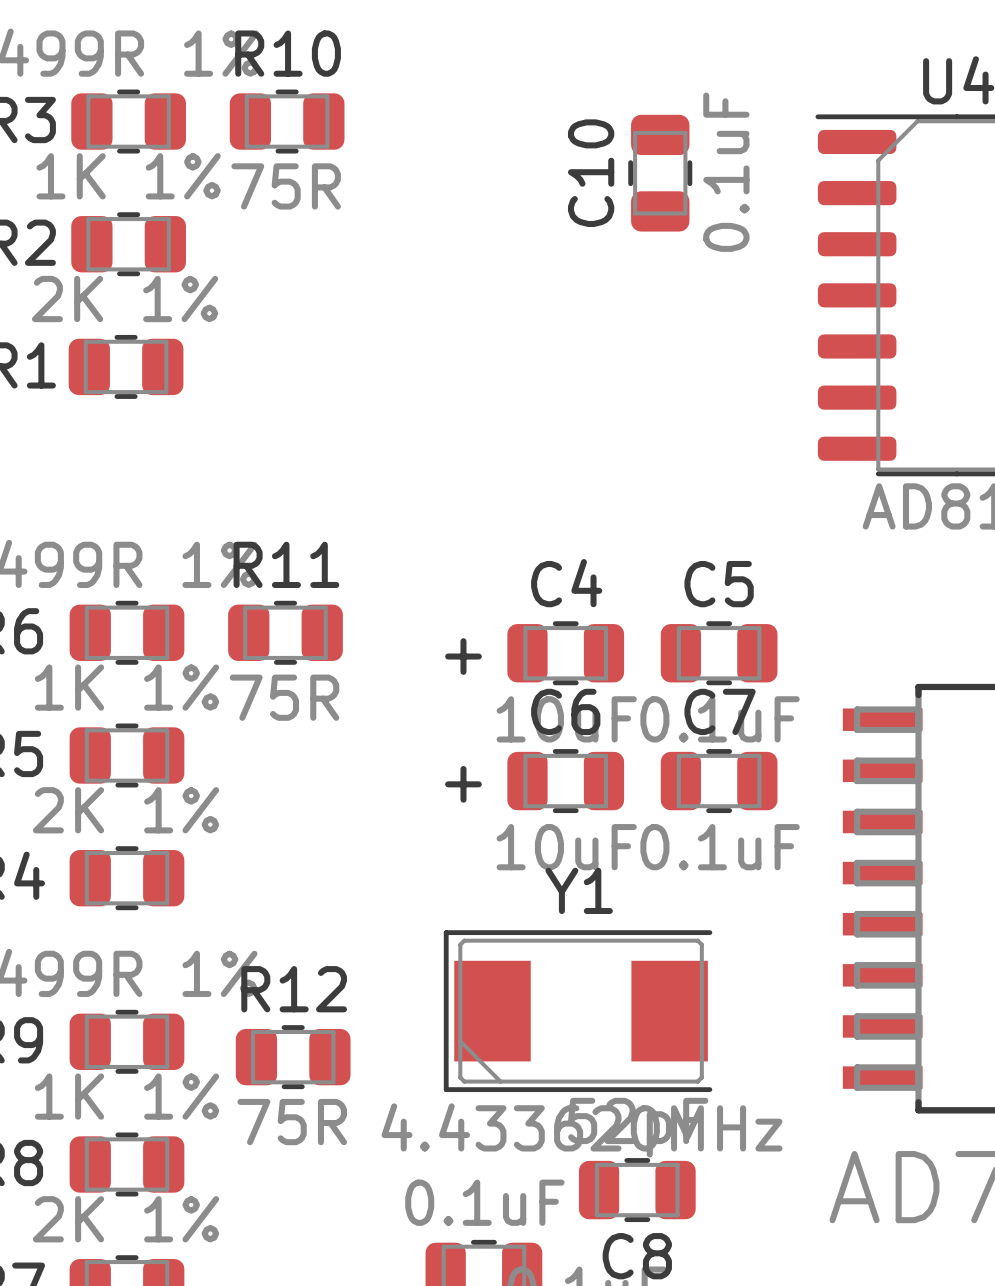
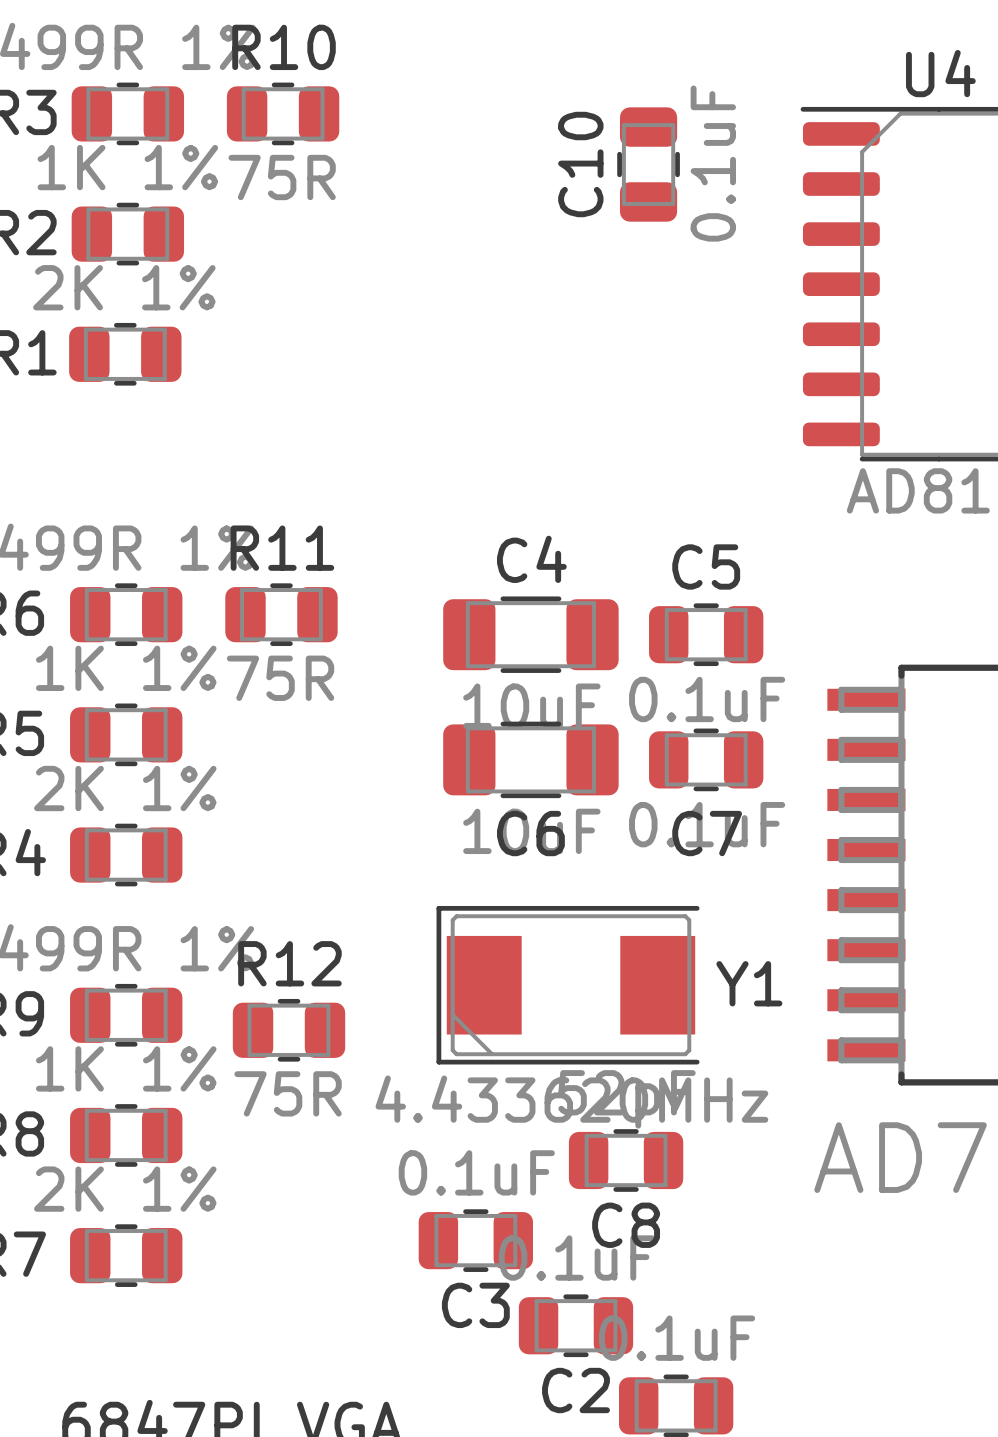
C4 footprint: [507, 621, 625, 686] -> [443, 596, 619, 673]
C6 name position: C6 (565, 711) -> C6 (530, 833)
C7 name position: C7 (720, 711) -> C7 (707, 833)
C6 footprint: [507, 749, 625, 814] -> [443, 721, 619, 799]
Y1 name position: Y1 (579, 890) -> Y1 (749, 983)

